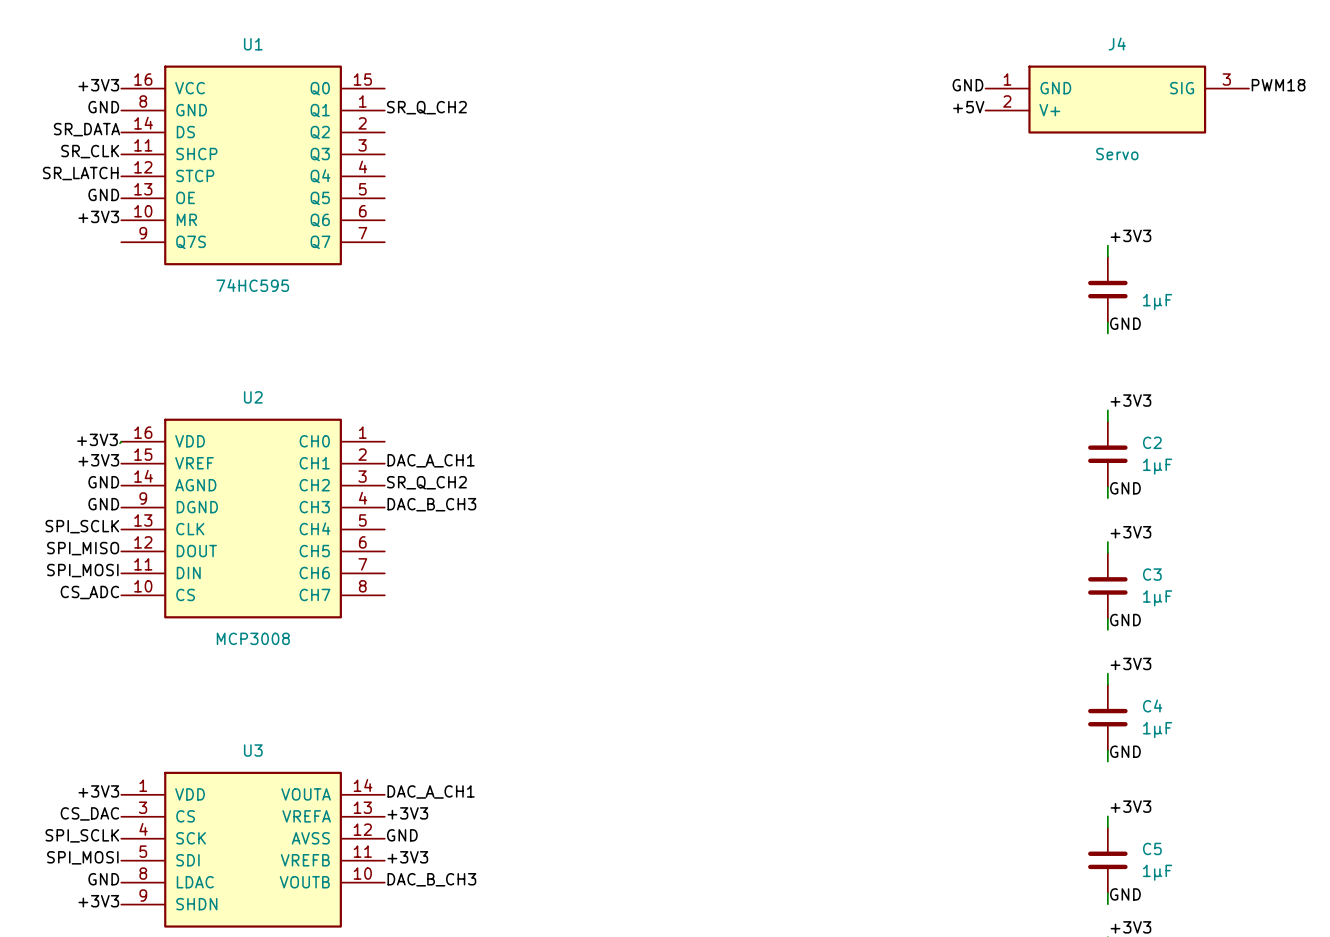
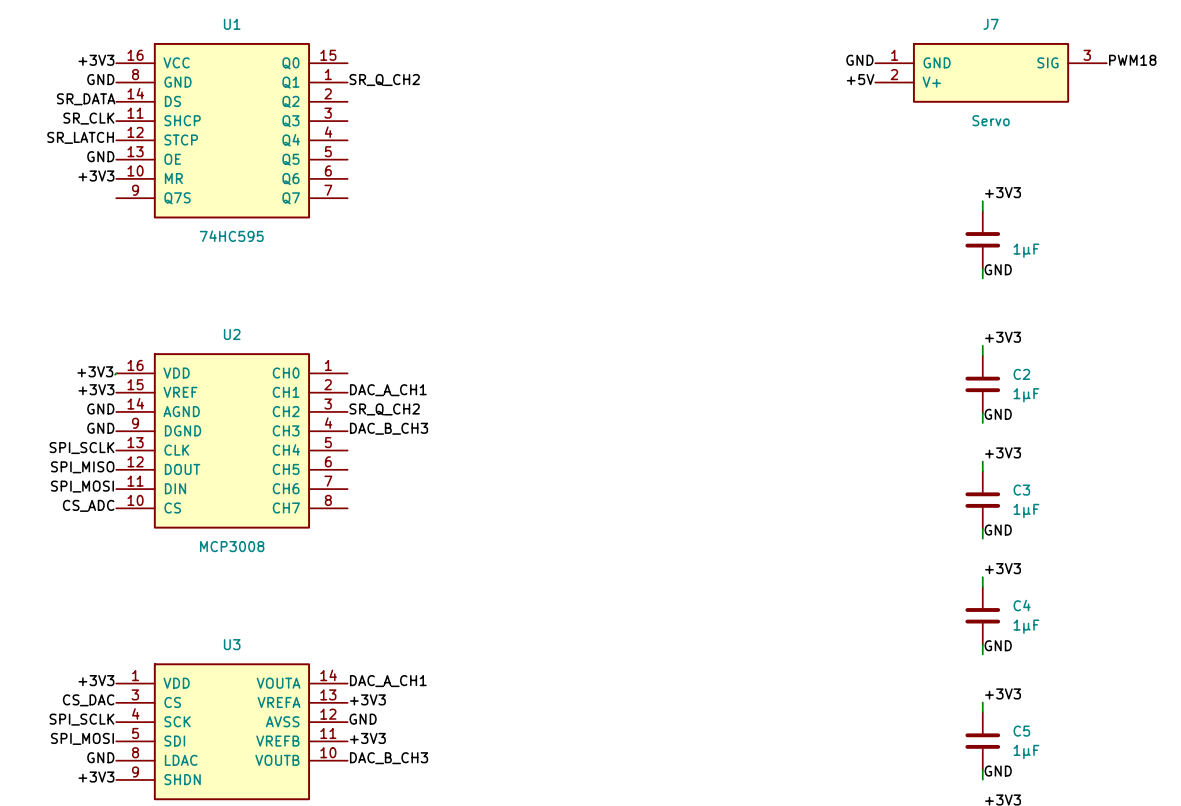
J4 name: J4 (1117, 44) -> J7 (991, 24)

